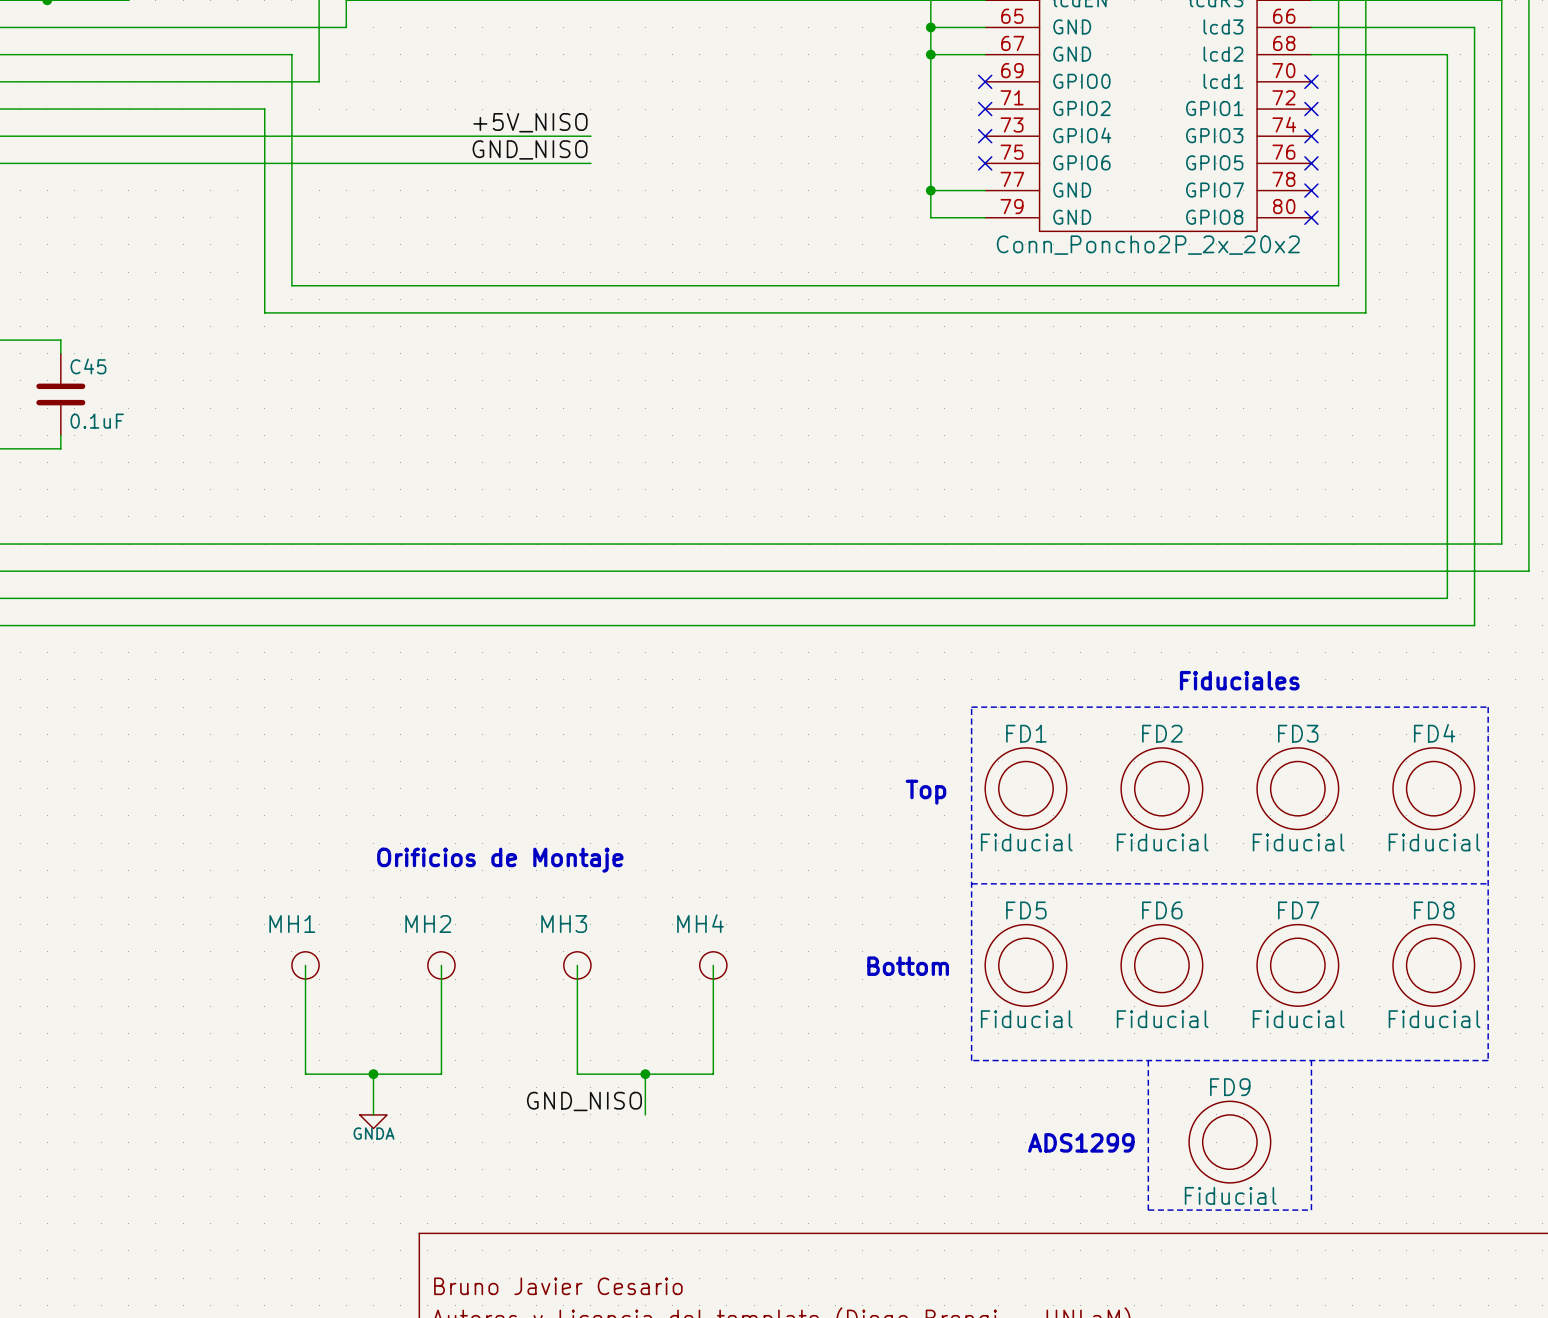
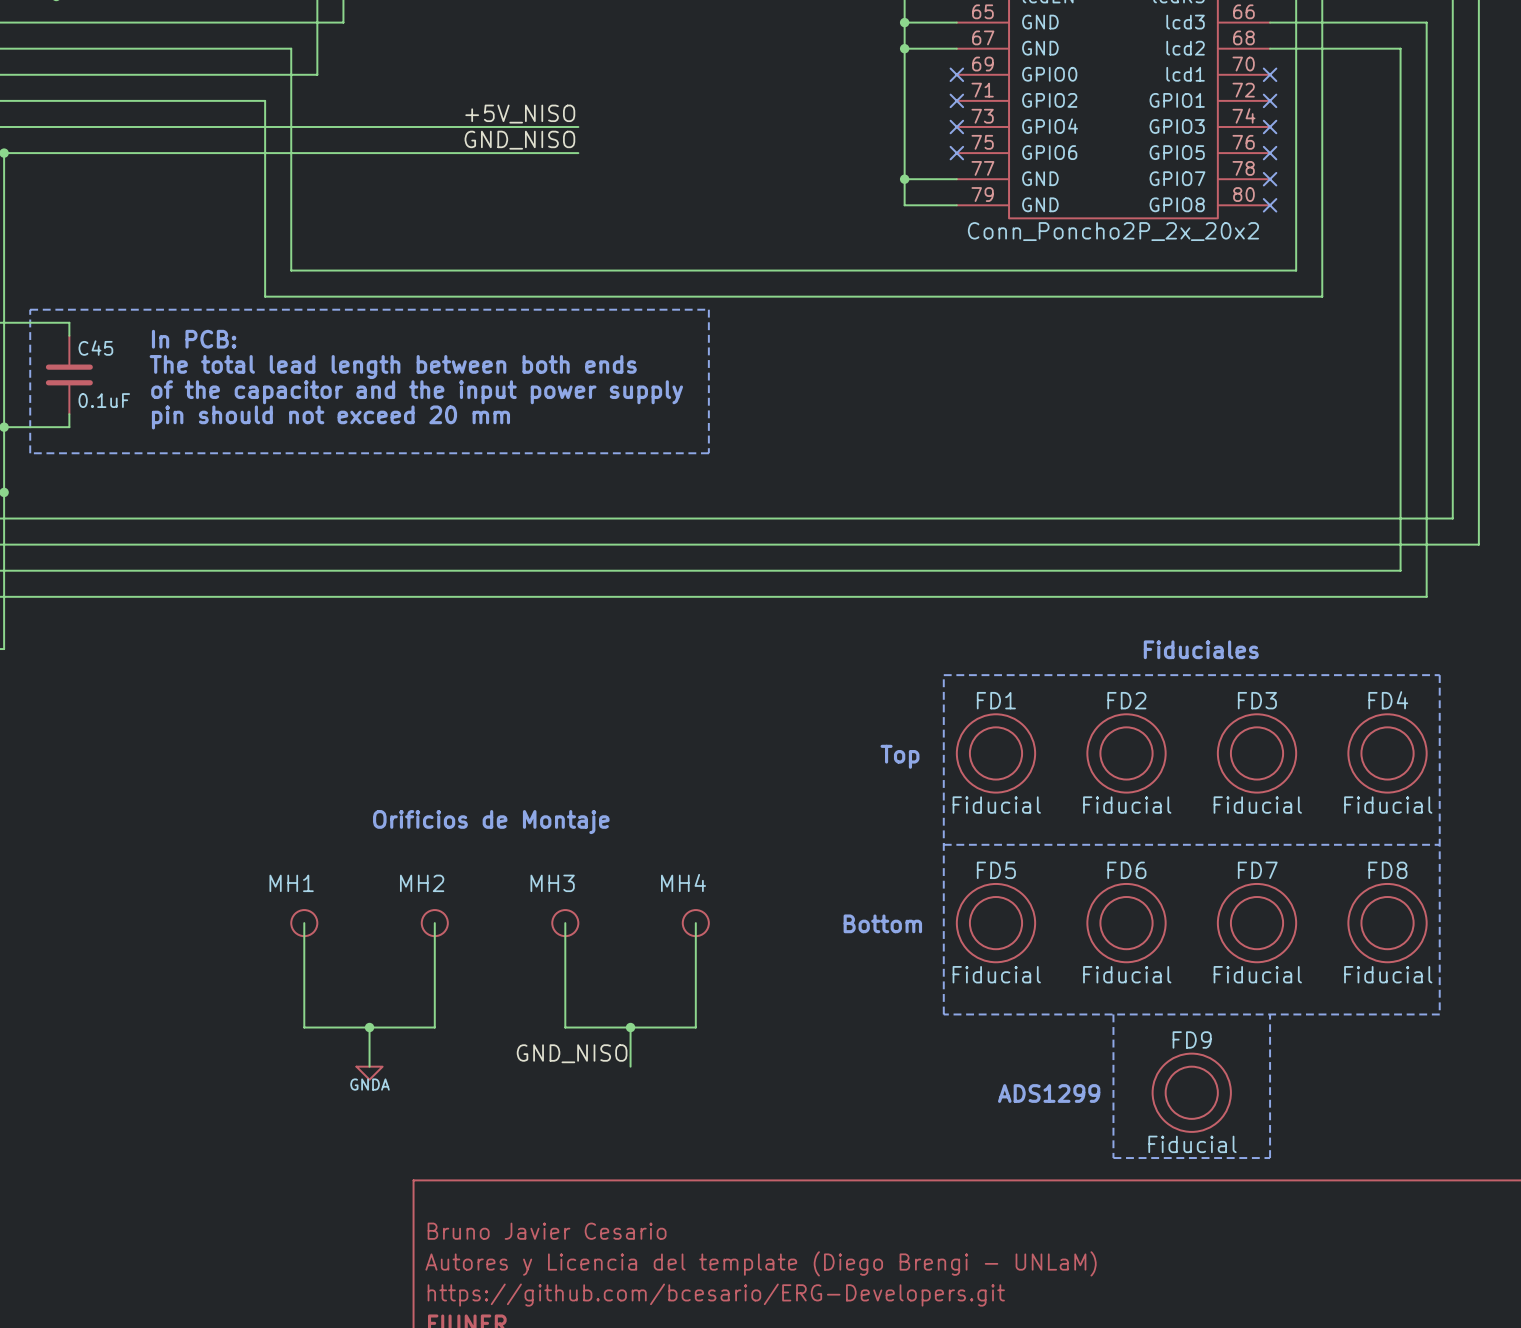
line: none -> (30, 309) (708, 309) (708, 453) (30, 453) (30, 309)
text: none -> In PCB: (194, 339)
text: none -> The total lead length between both ends (393, 367)
text: none -> of the capacitor and the input power supply (417, 392)
text: none -> pin should not exceed 20 mm (330, 417)

